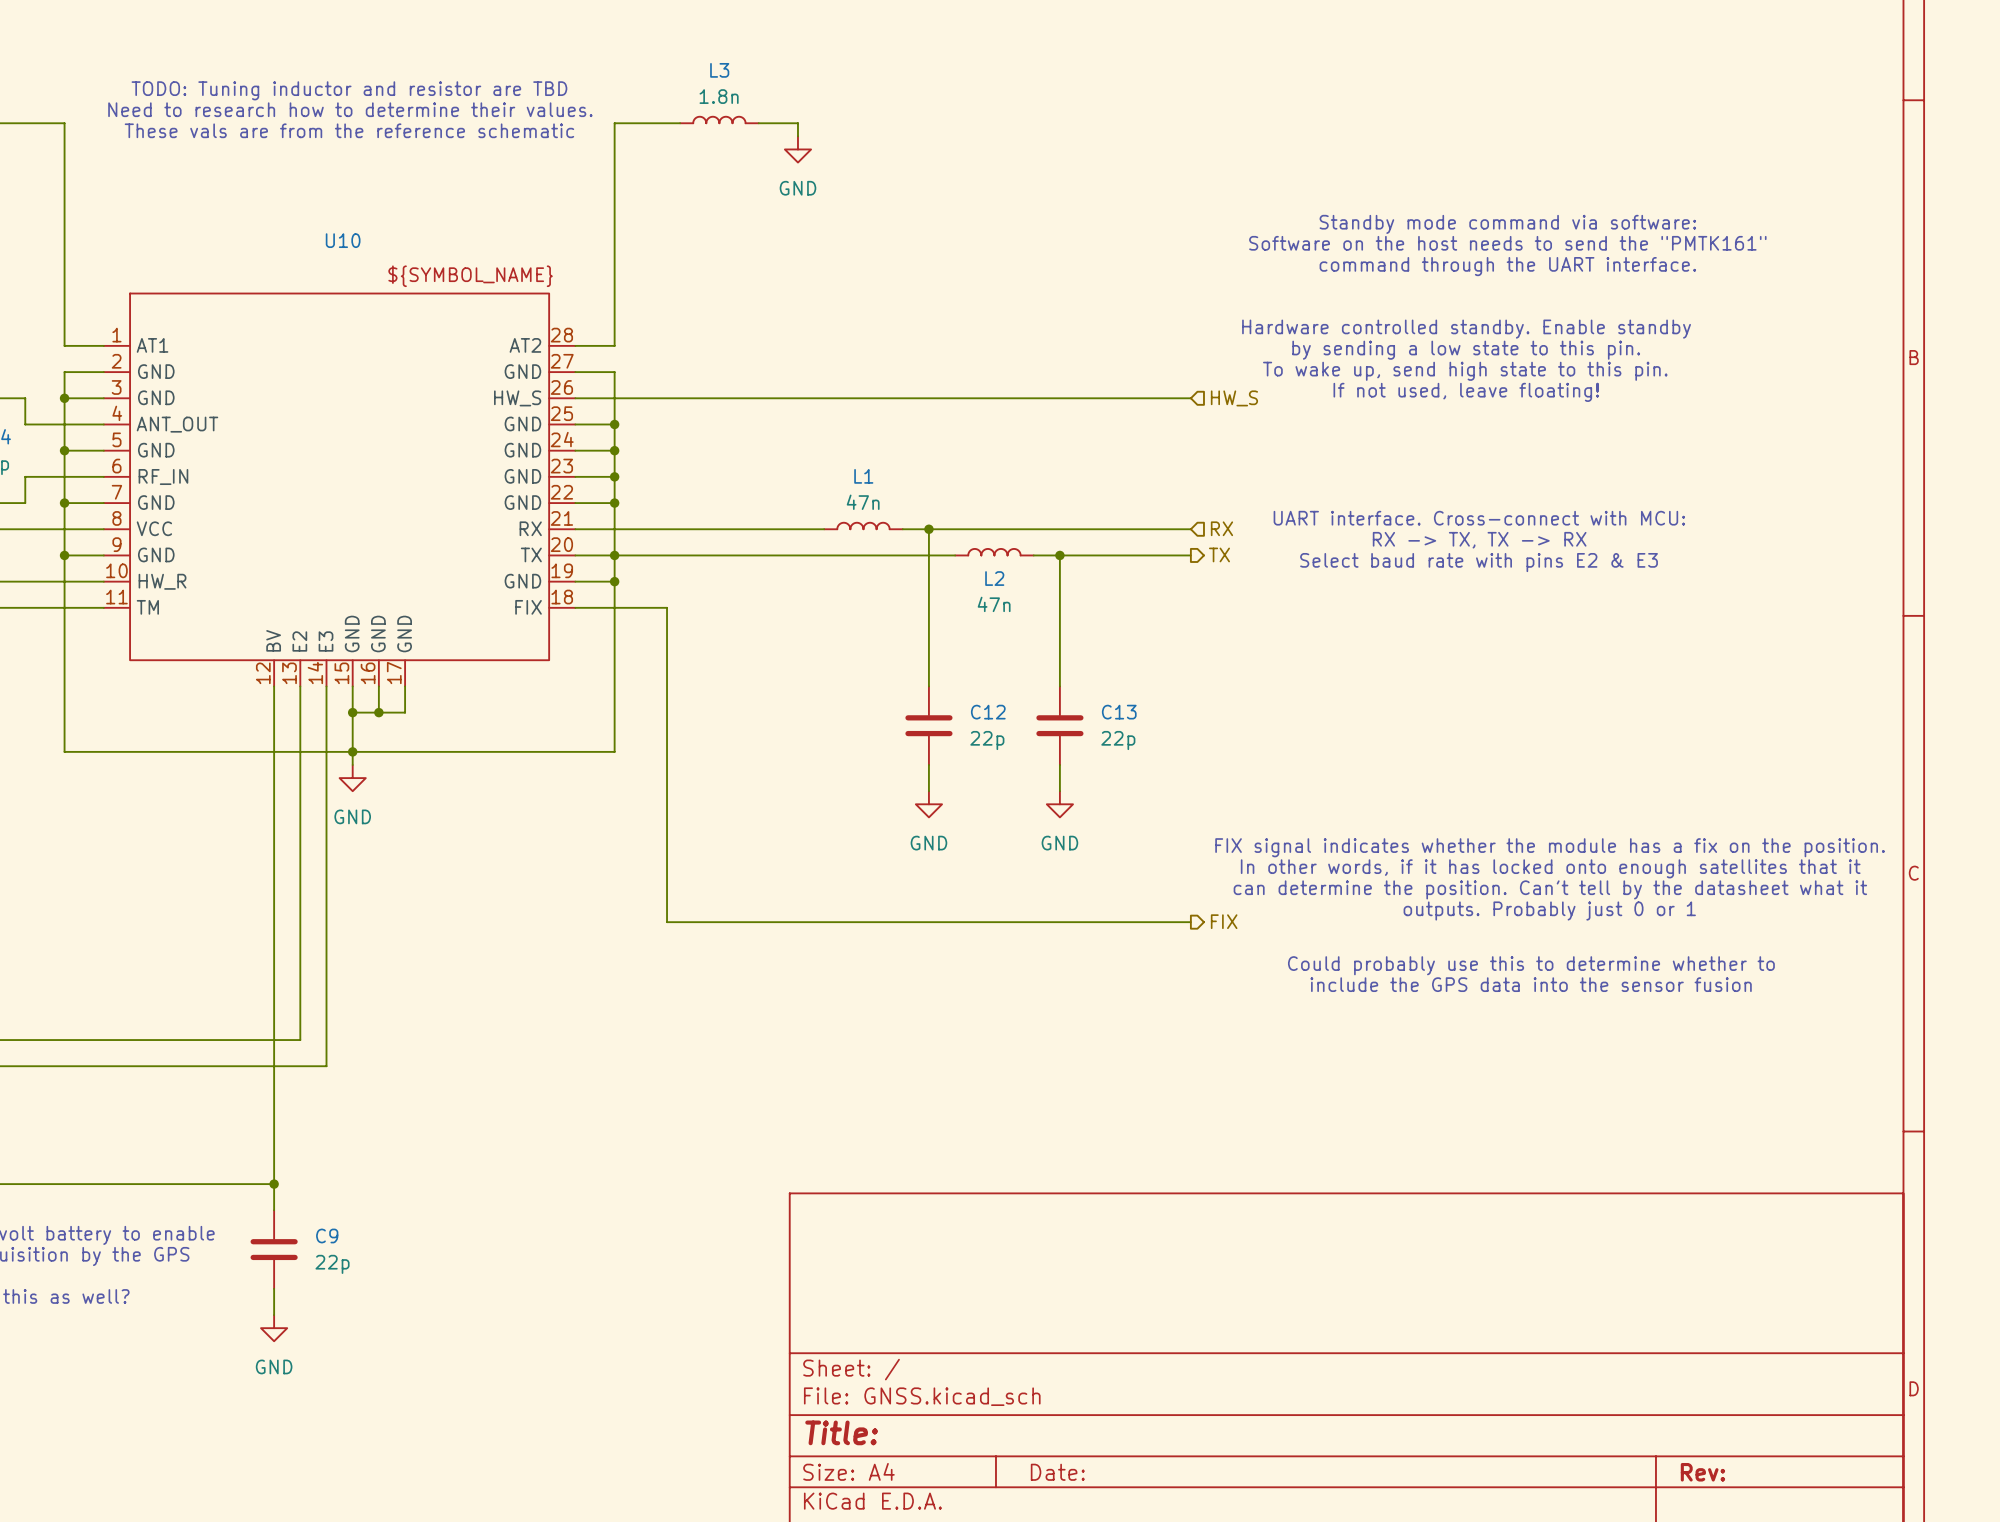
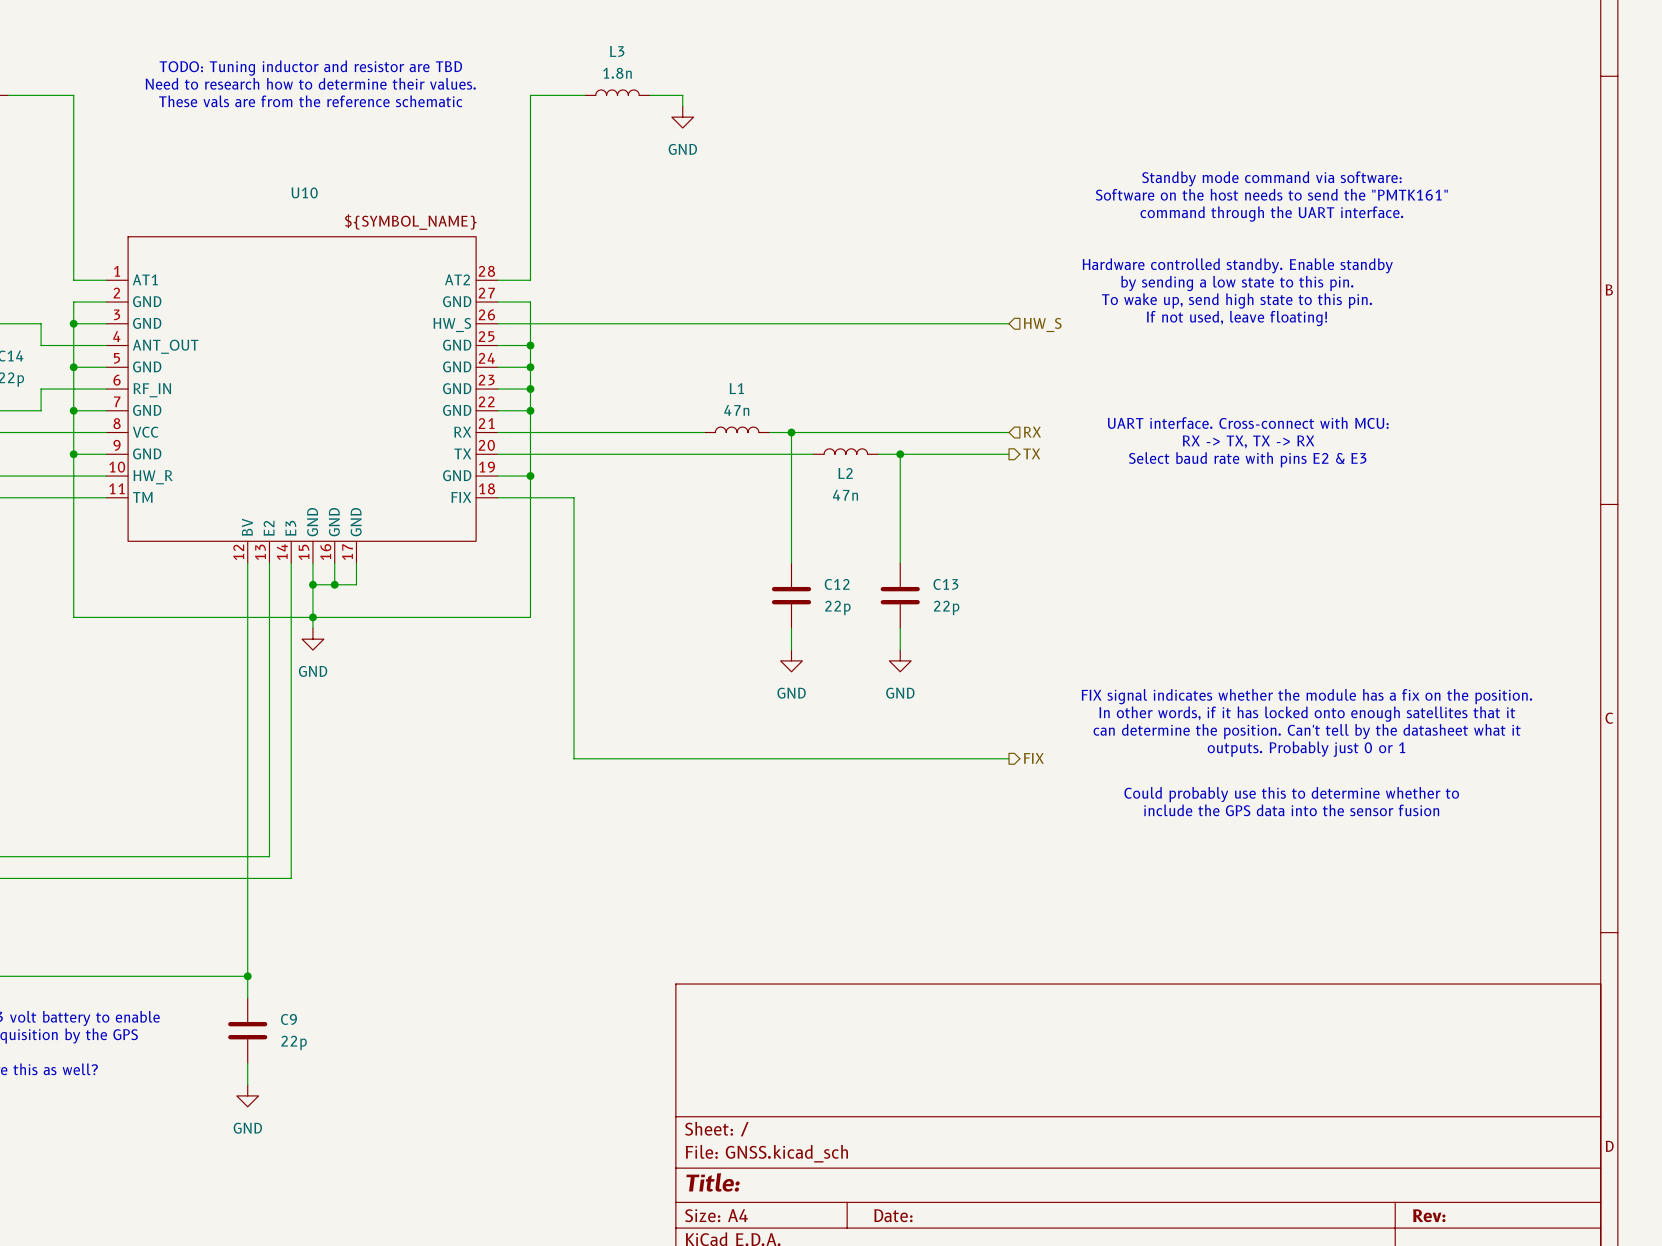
junction: (614, 555) -> none

